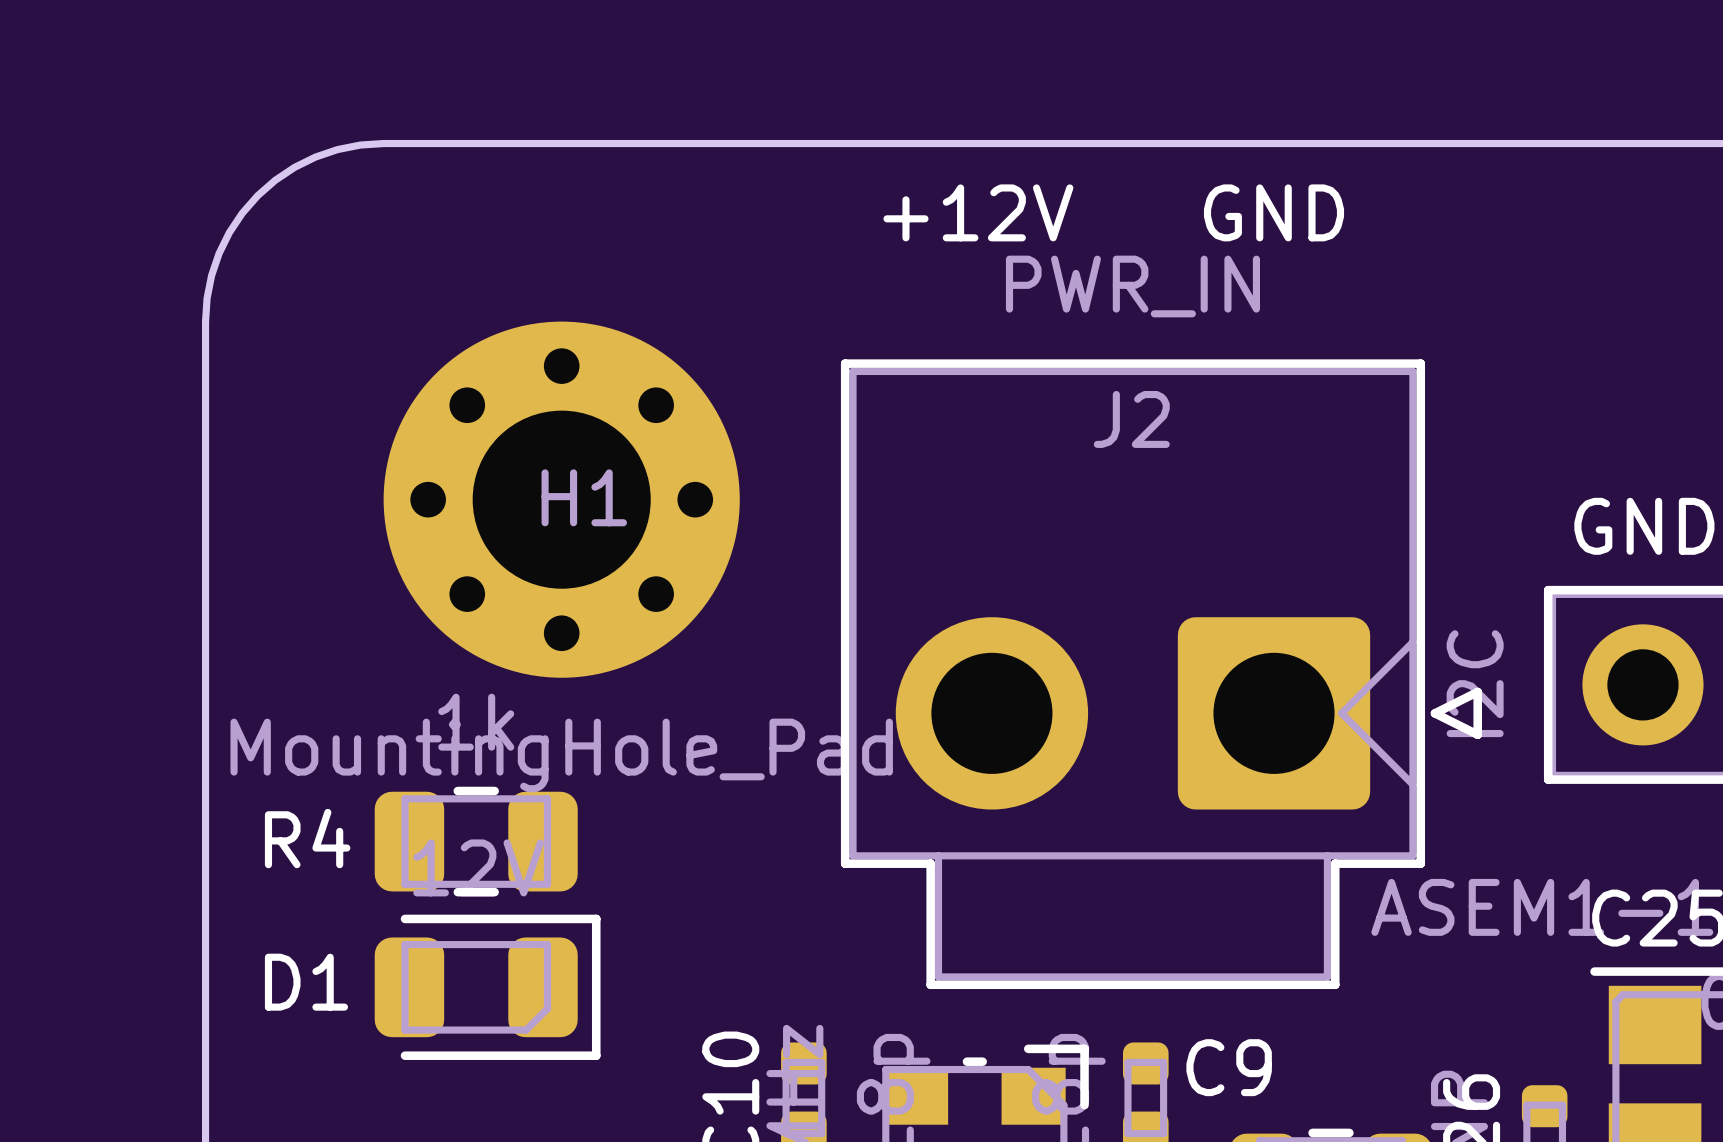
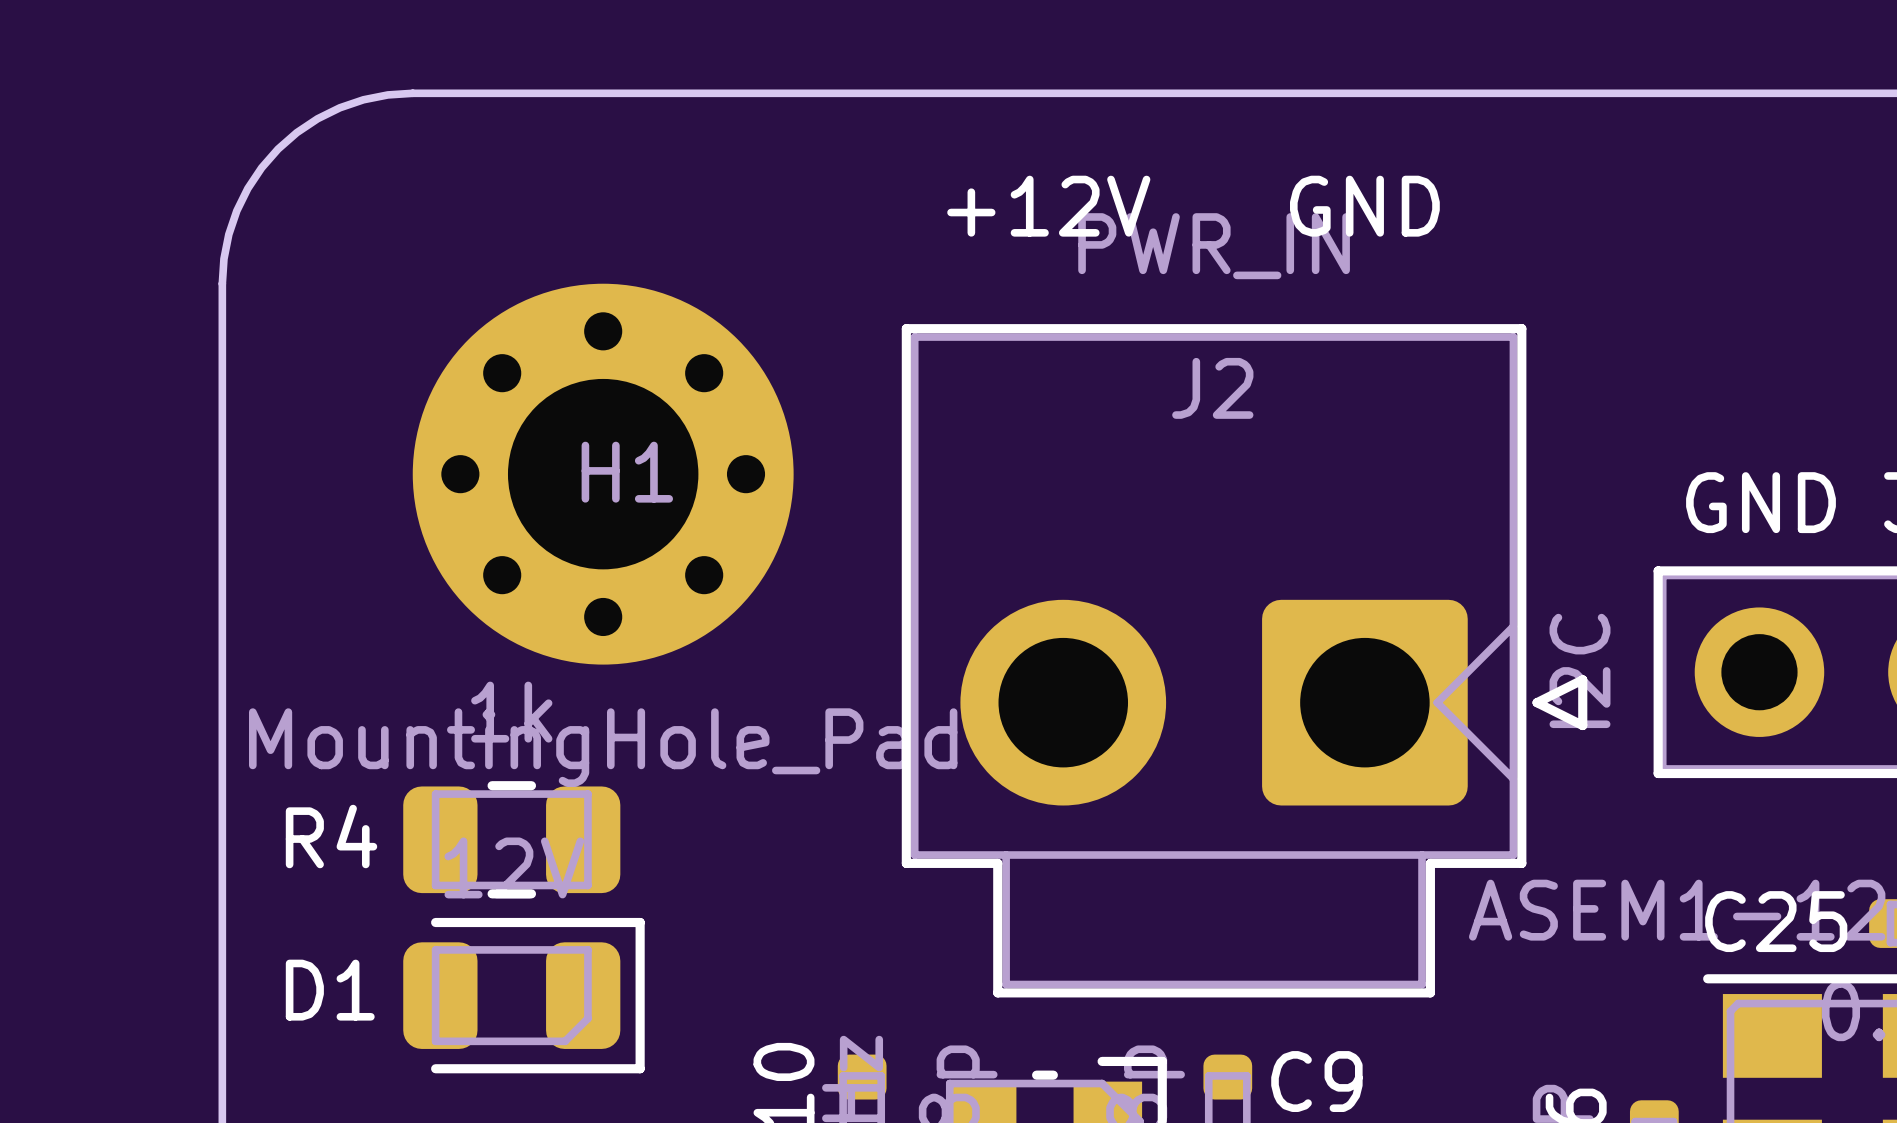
text position: +12V (978, 212) -> +12V (1048, 206)
text position: GND (1274, 212) -> GND (1364, 206)

